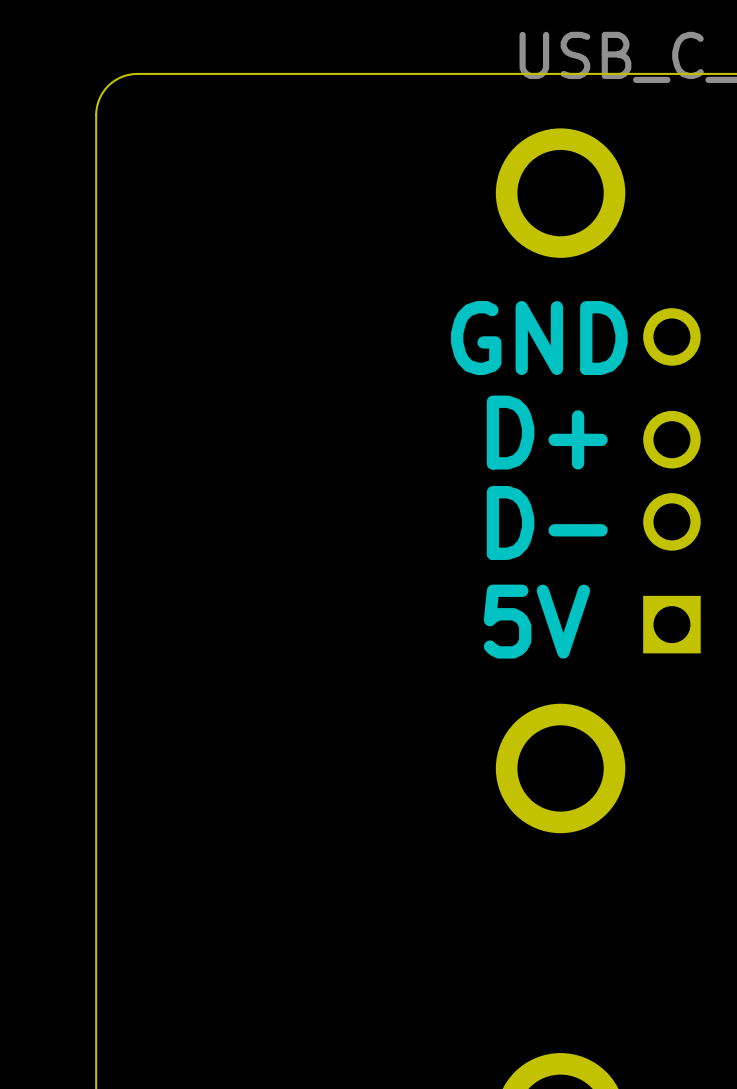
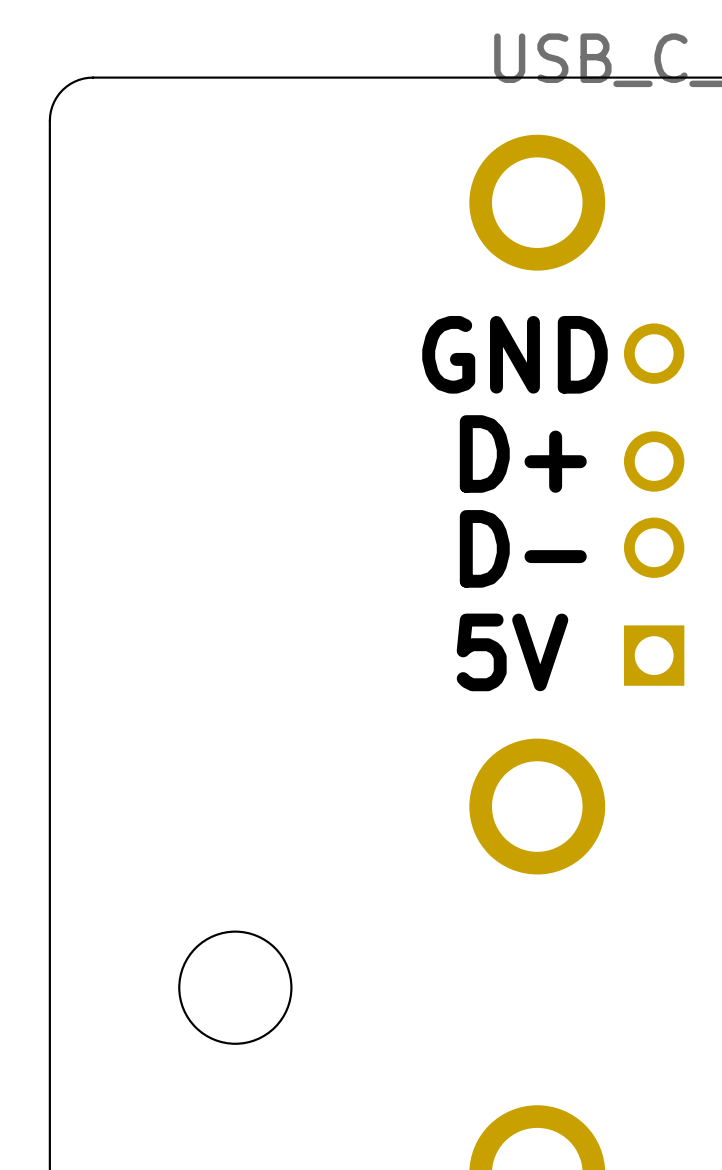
round board edge: none -> [178, 930, 293, 1045]

